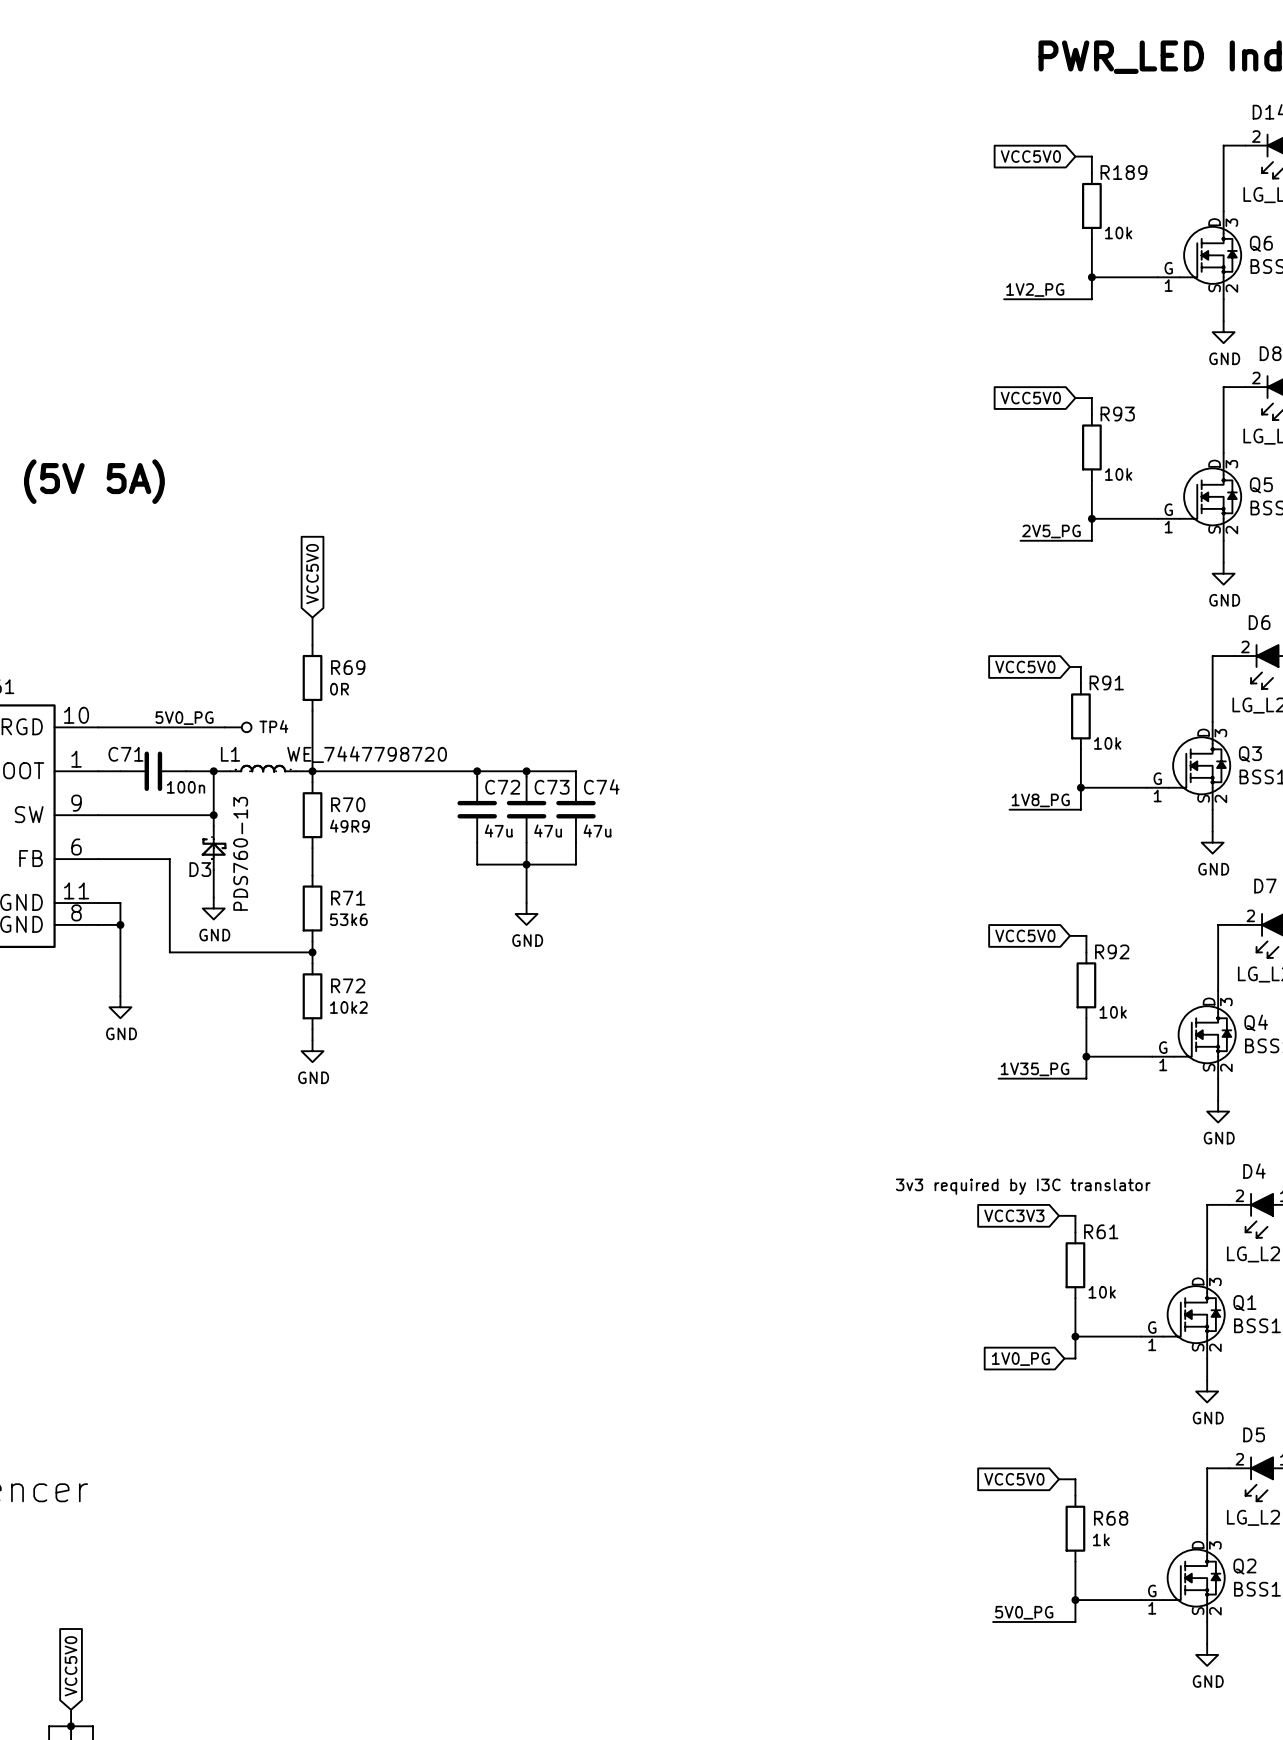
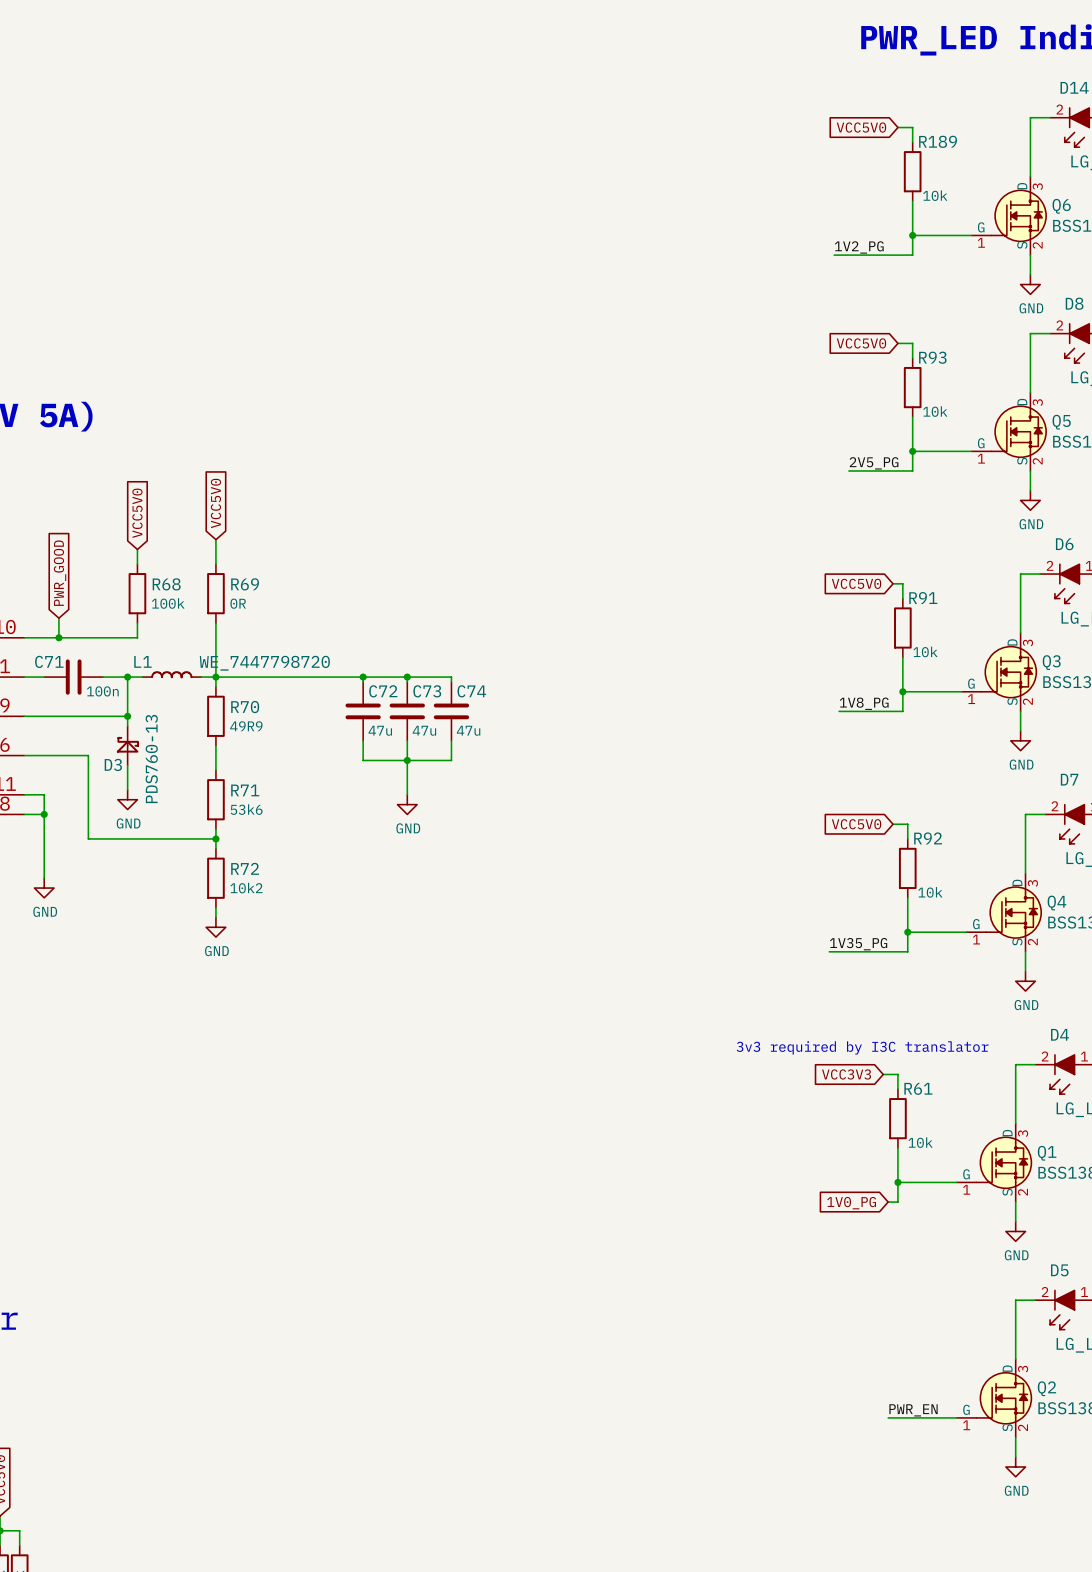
global label: none -> VCC5V0 (137, 513)
wire: none -> (137, 549) (137, 564)
global label: none -> PWR_GOOD (60, 573)
wire: none -> (58, 618) (58, 637)
wire: none -> (137, 623) (137, 637)
label: 5V0_PG (184, 718) -> none
junction: none -> (58, 637)
TP4: (238, 727) -> none
global label: VCC5V0 (1014, 1479) -> none
wire: (1058, 1479) (1075, 1479) (1075, 1495) -> none
R68 position: (1075, 1528) -> (137, 593)
R68 text: 1k (1101, 1539) -> 100k (168, 603)
wire: (1075, 1561) (1075, 1622) (993, 1622) -> none
label: none -> PWR_EN (913, 1410)
wire: none -> (888, 1417) (897, 1417)
junction: (1075, 1600) -> none
label: 5V0_PG (1024, 1612) -> none

